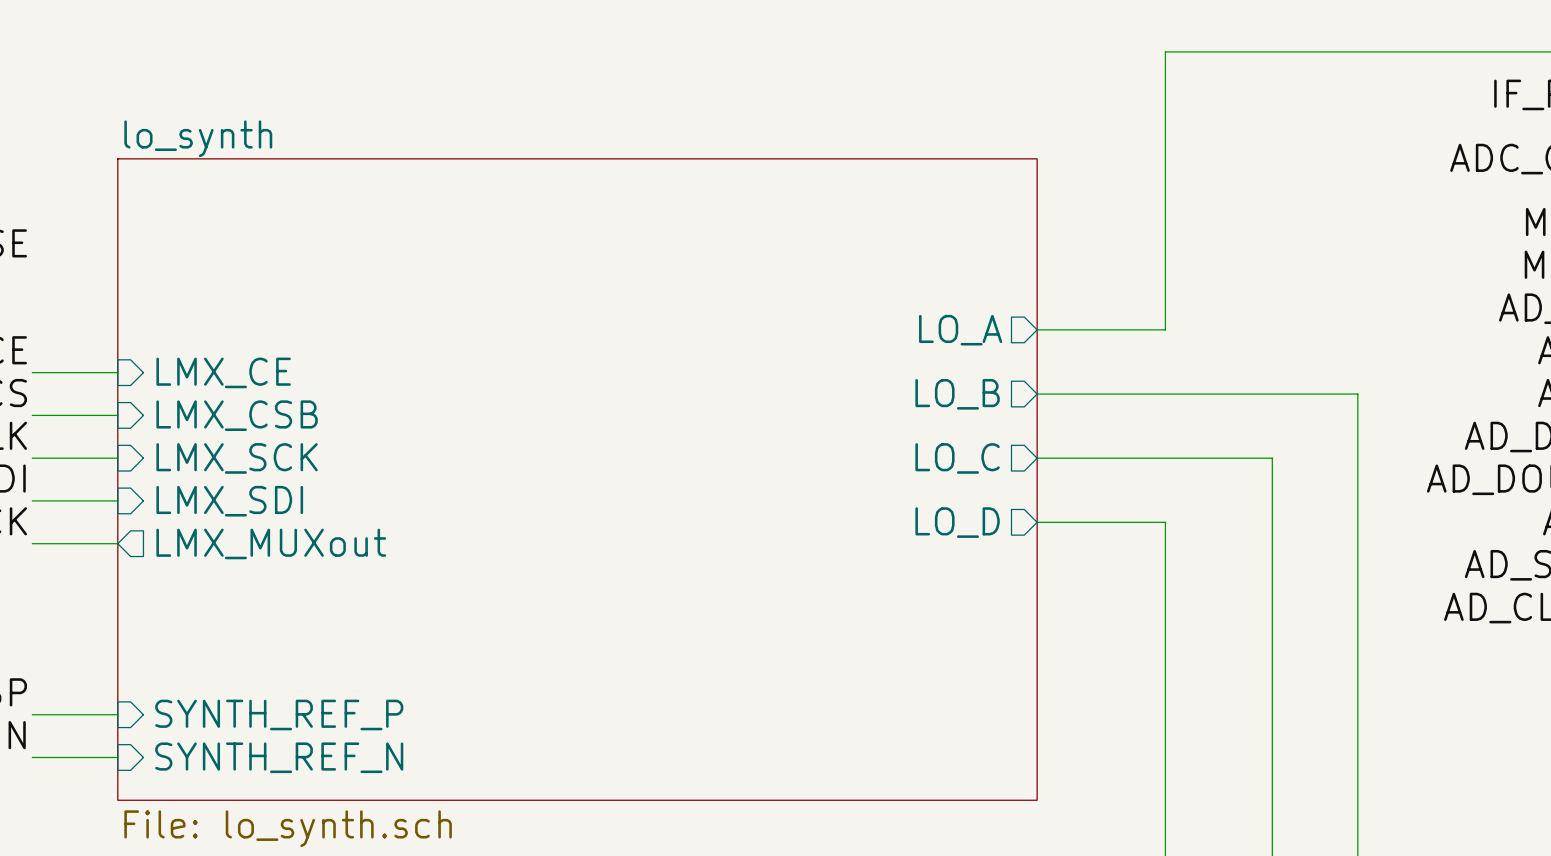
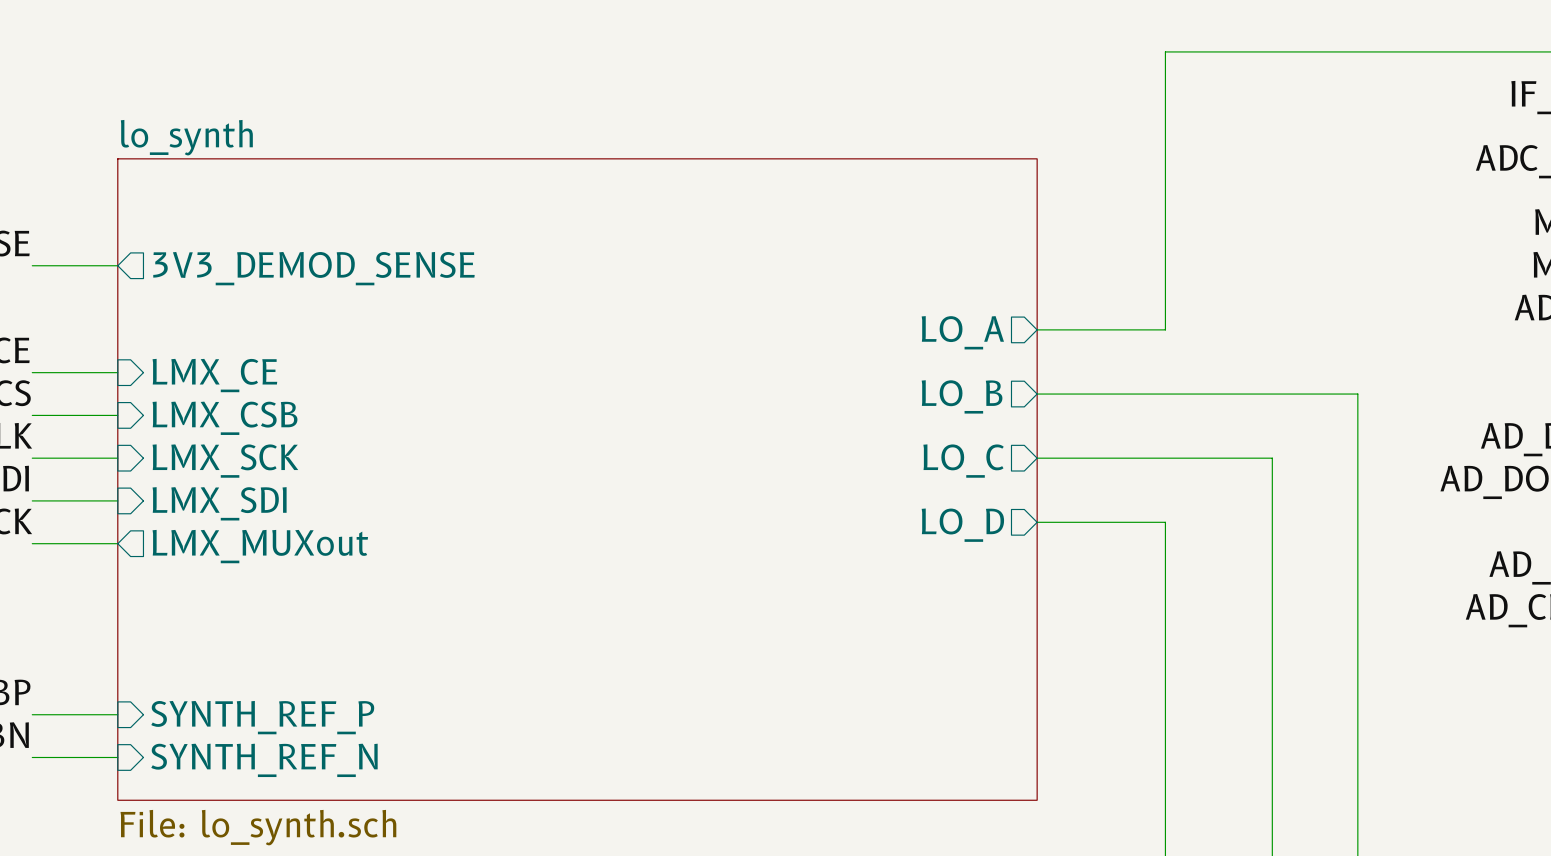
wire: none -> (32, 265) (117, 265)
sheet pin: none -> 3V3_DEMOD_SENSE (313, 268)

